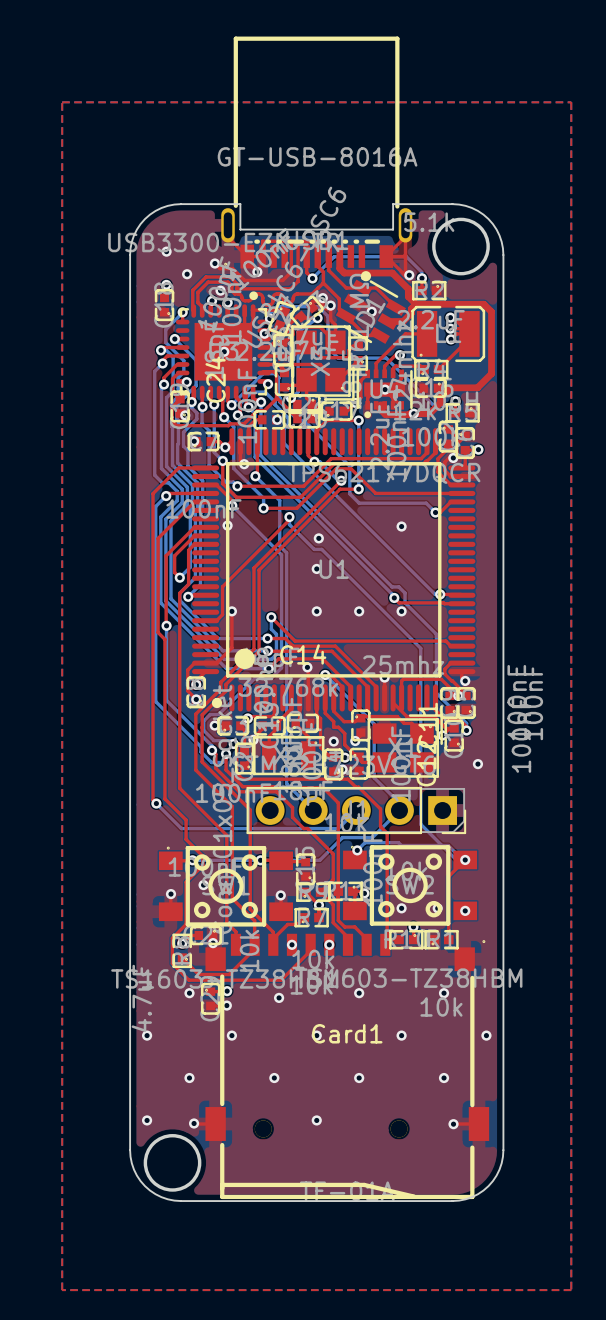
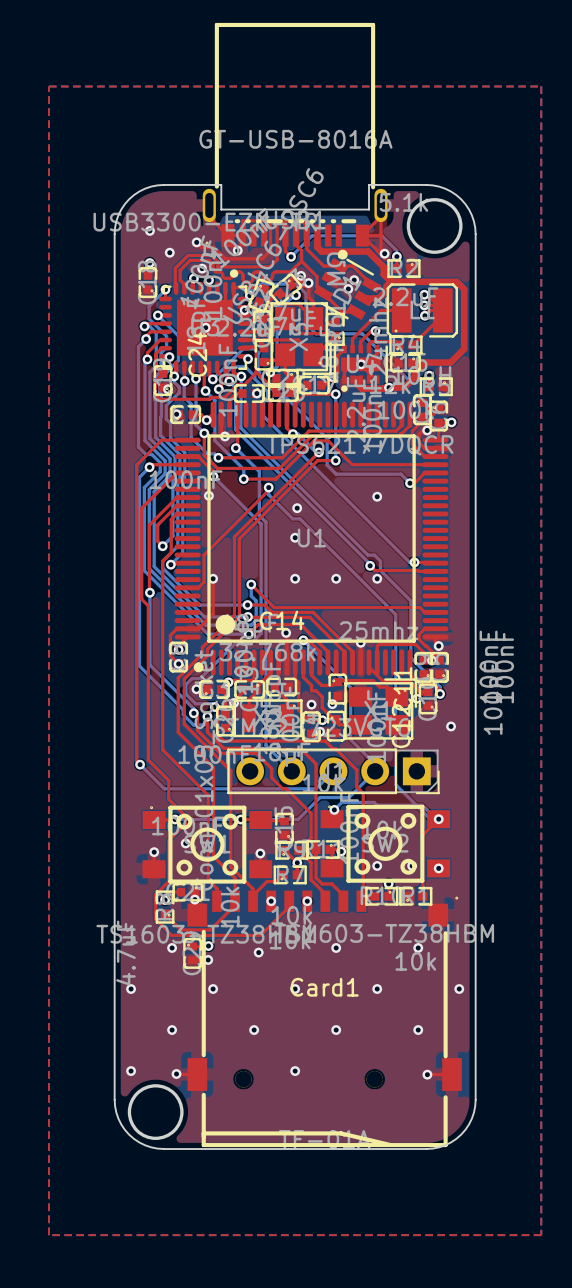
via: none -> (354, 280)

